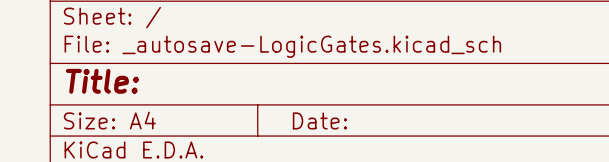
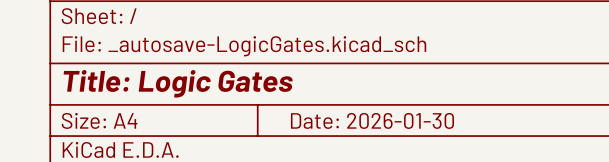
title block: Title: (102, 81) -> Title: Logic Gates (178, 83)
title block: Date: (319, 120) -> Date: 2026-01-30 (372, 120)

